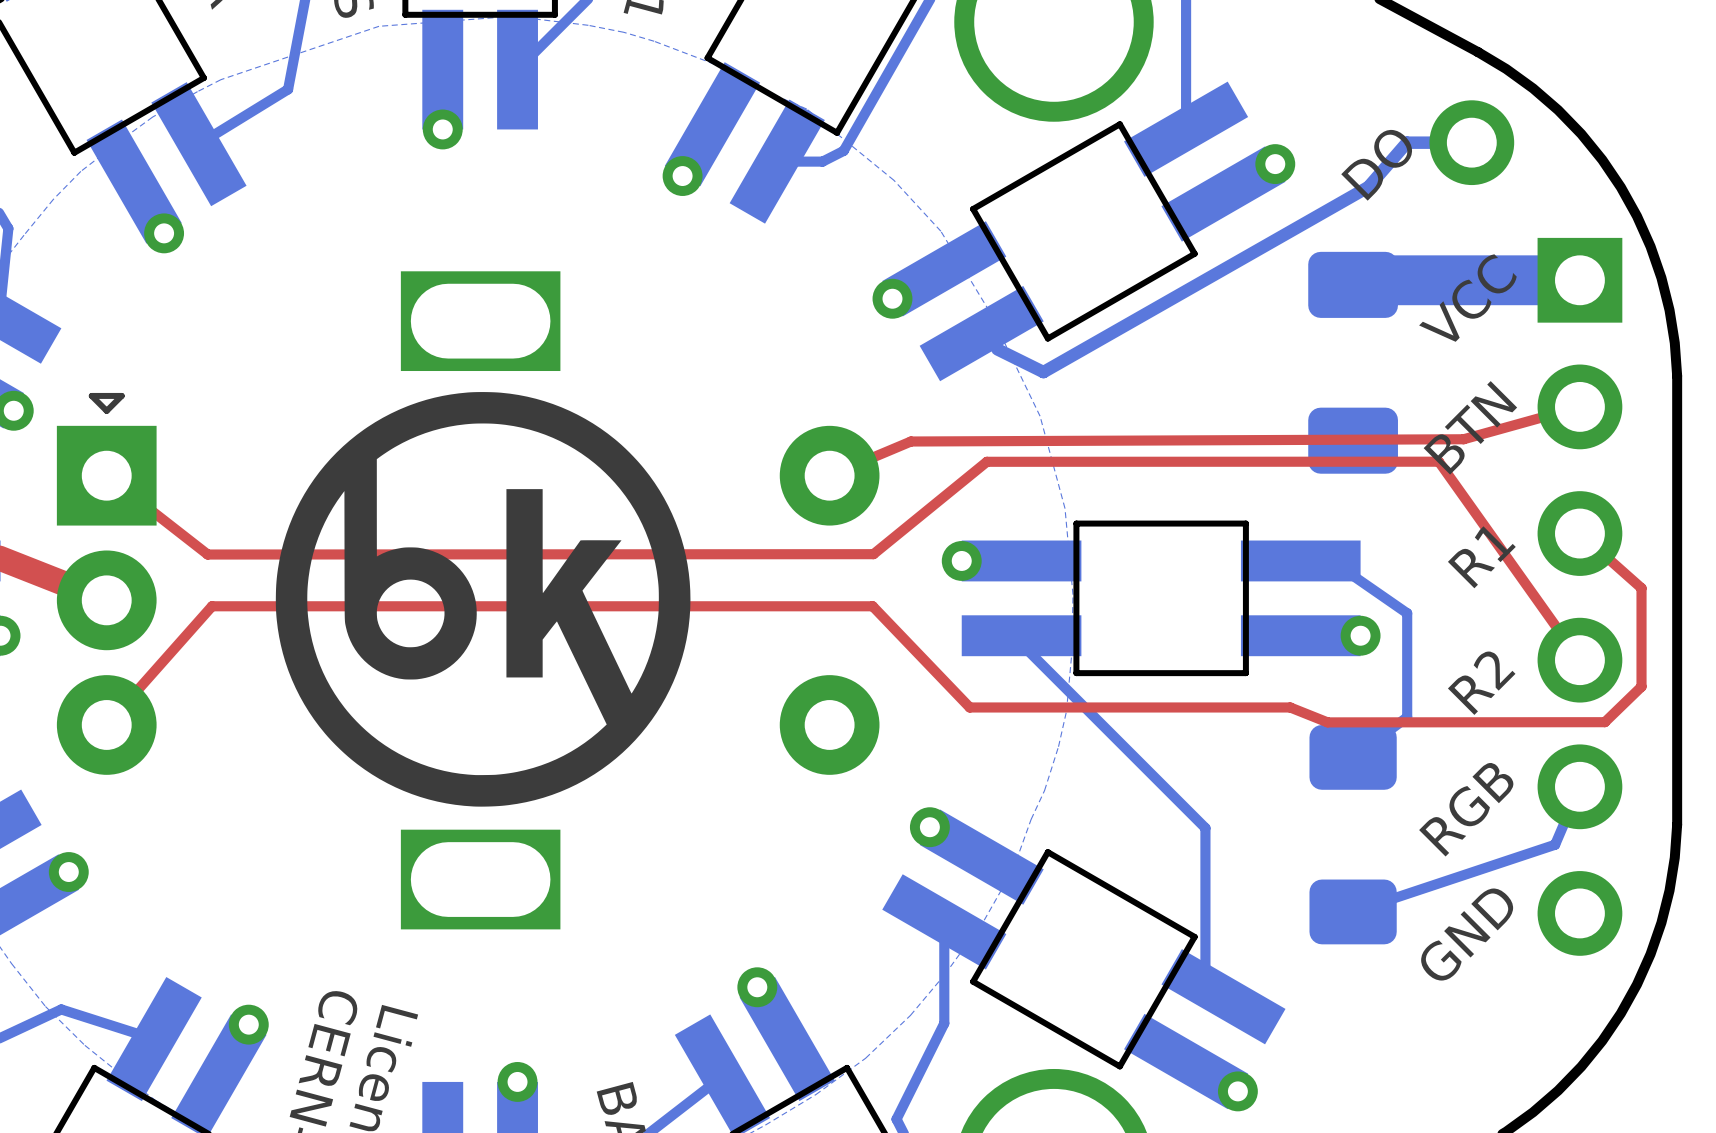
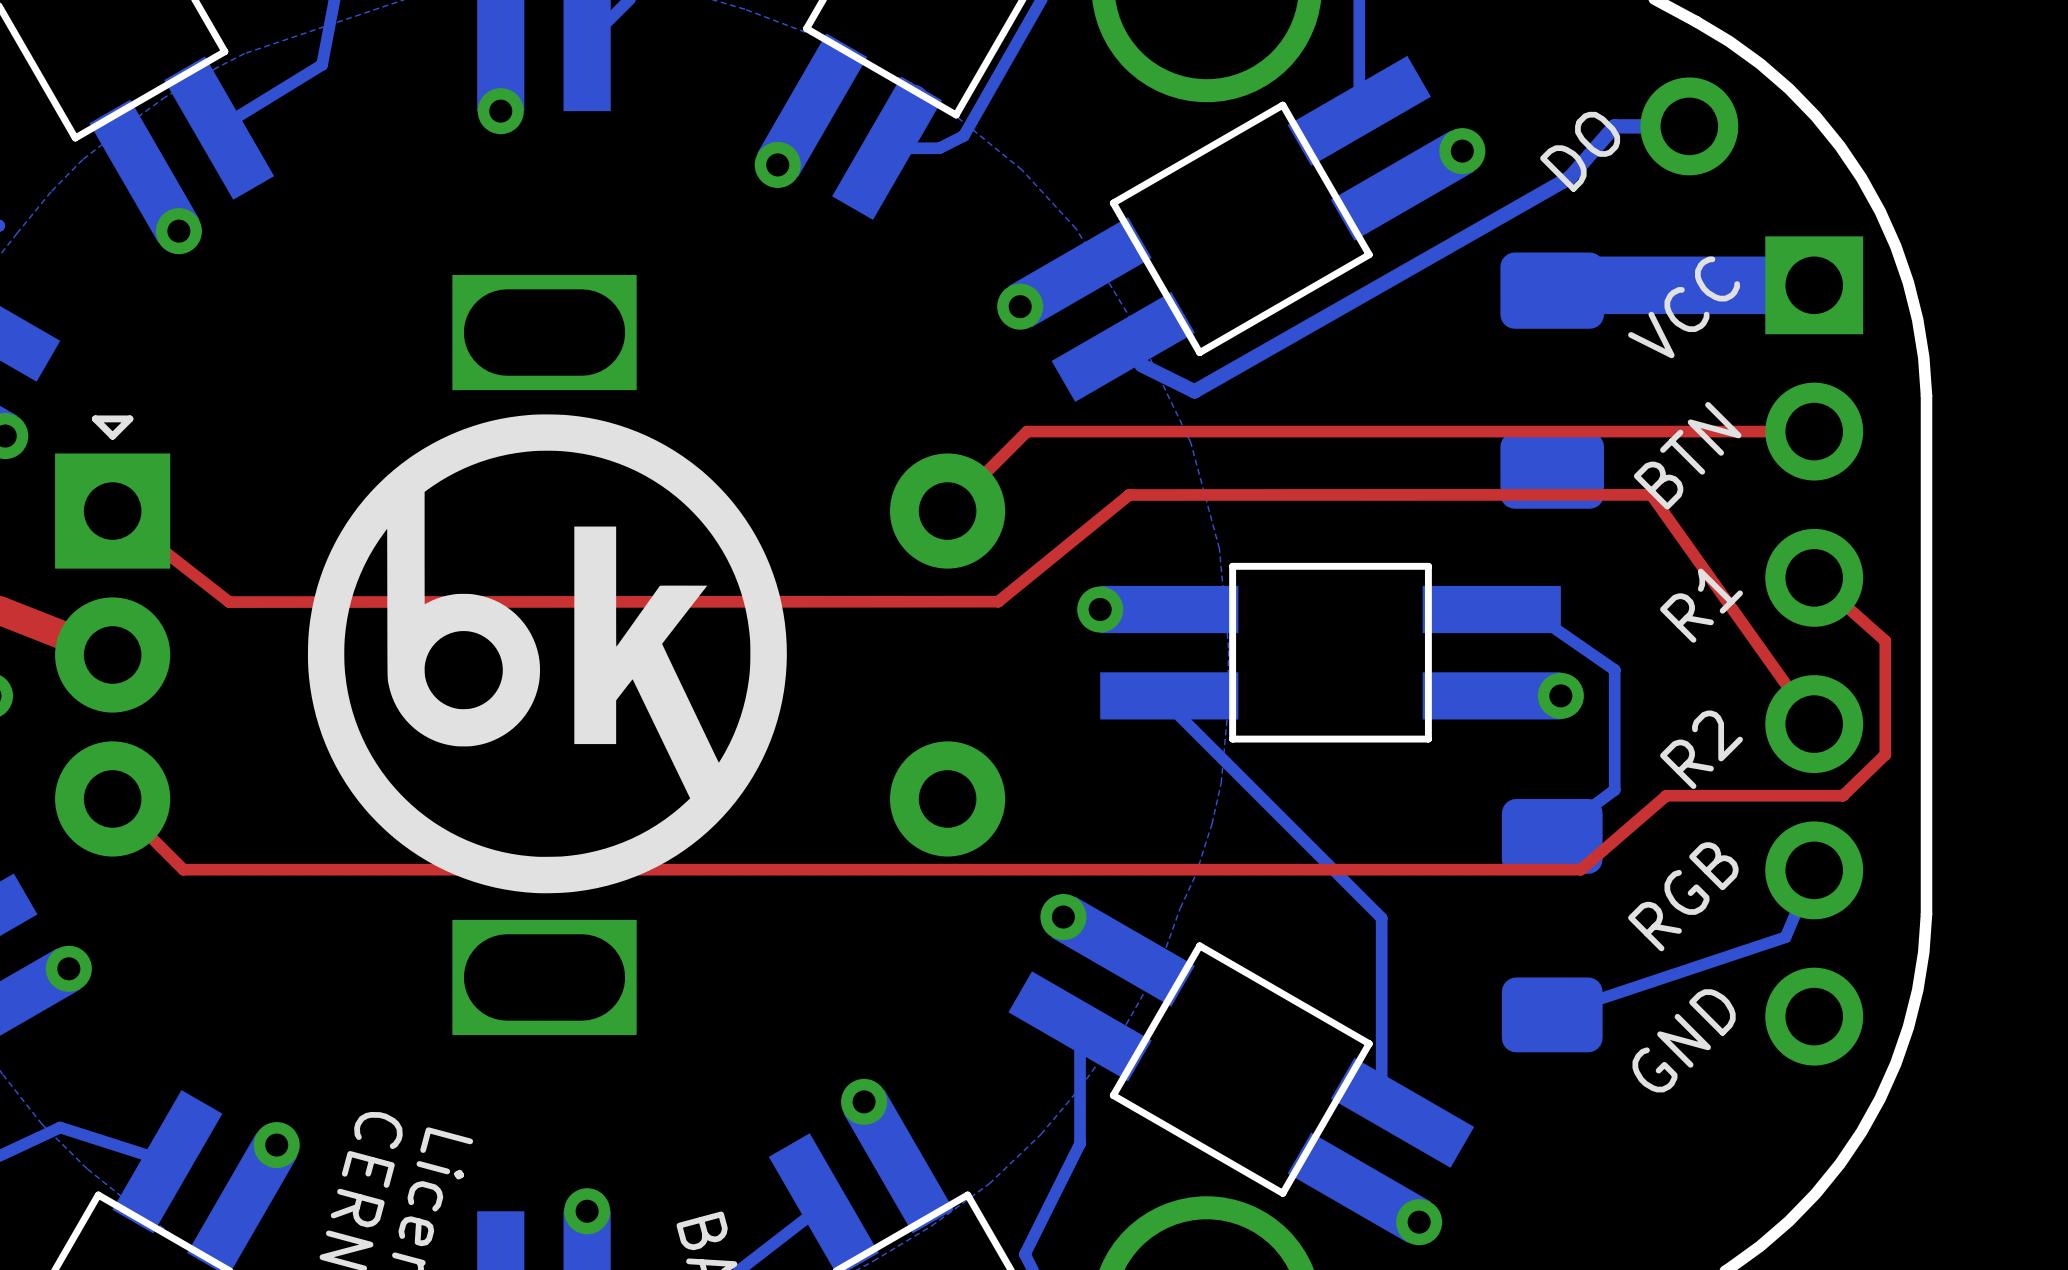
top track: (1579, 406) (1463, 439) (910, 441) (829, 475) -> (1814, 431) (1027, 431) (947, 511)
top track: (1604, 722) (1327, 722) (1290, 707) (969, 707) (872, 606) (212, 606) (106, 724) -> (1843, 795) (1666, 795) (1580, 869) (183, 869) (112, 798)

